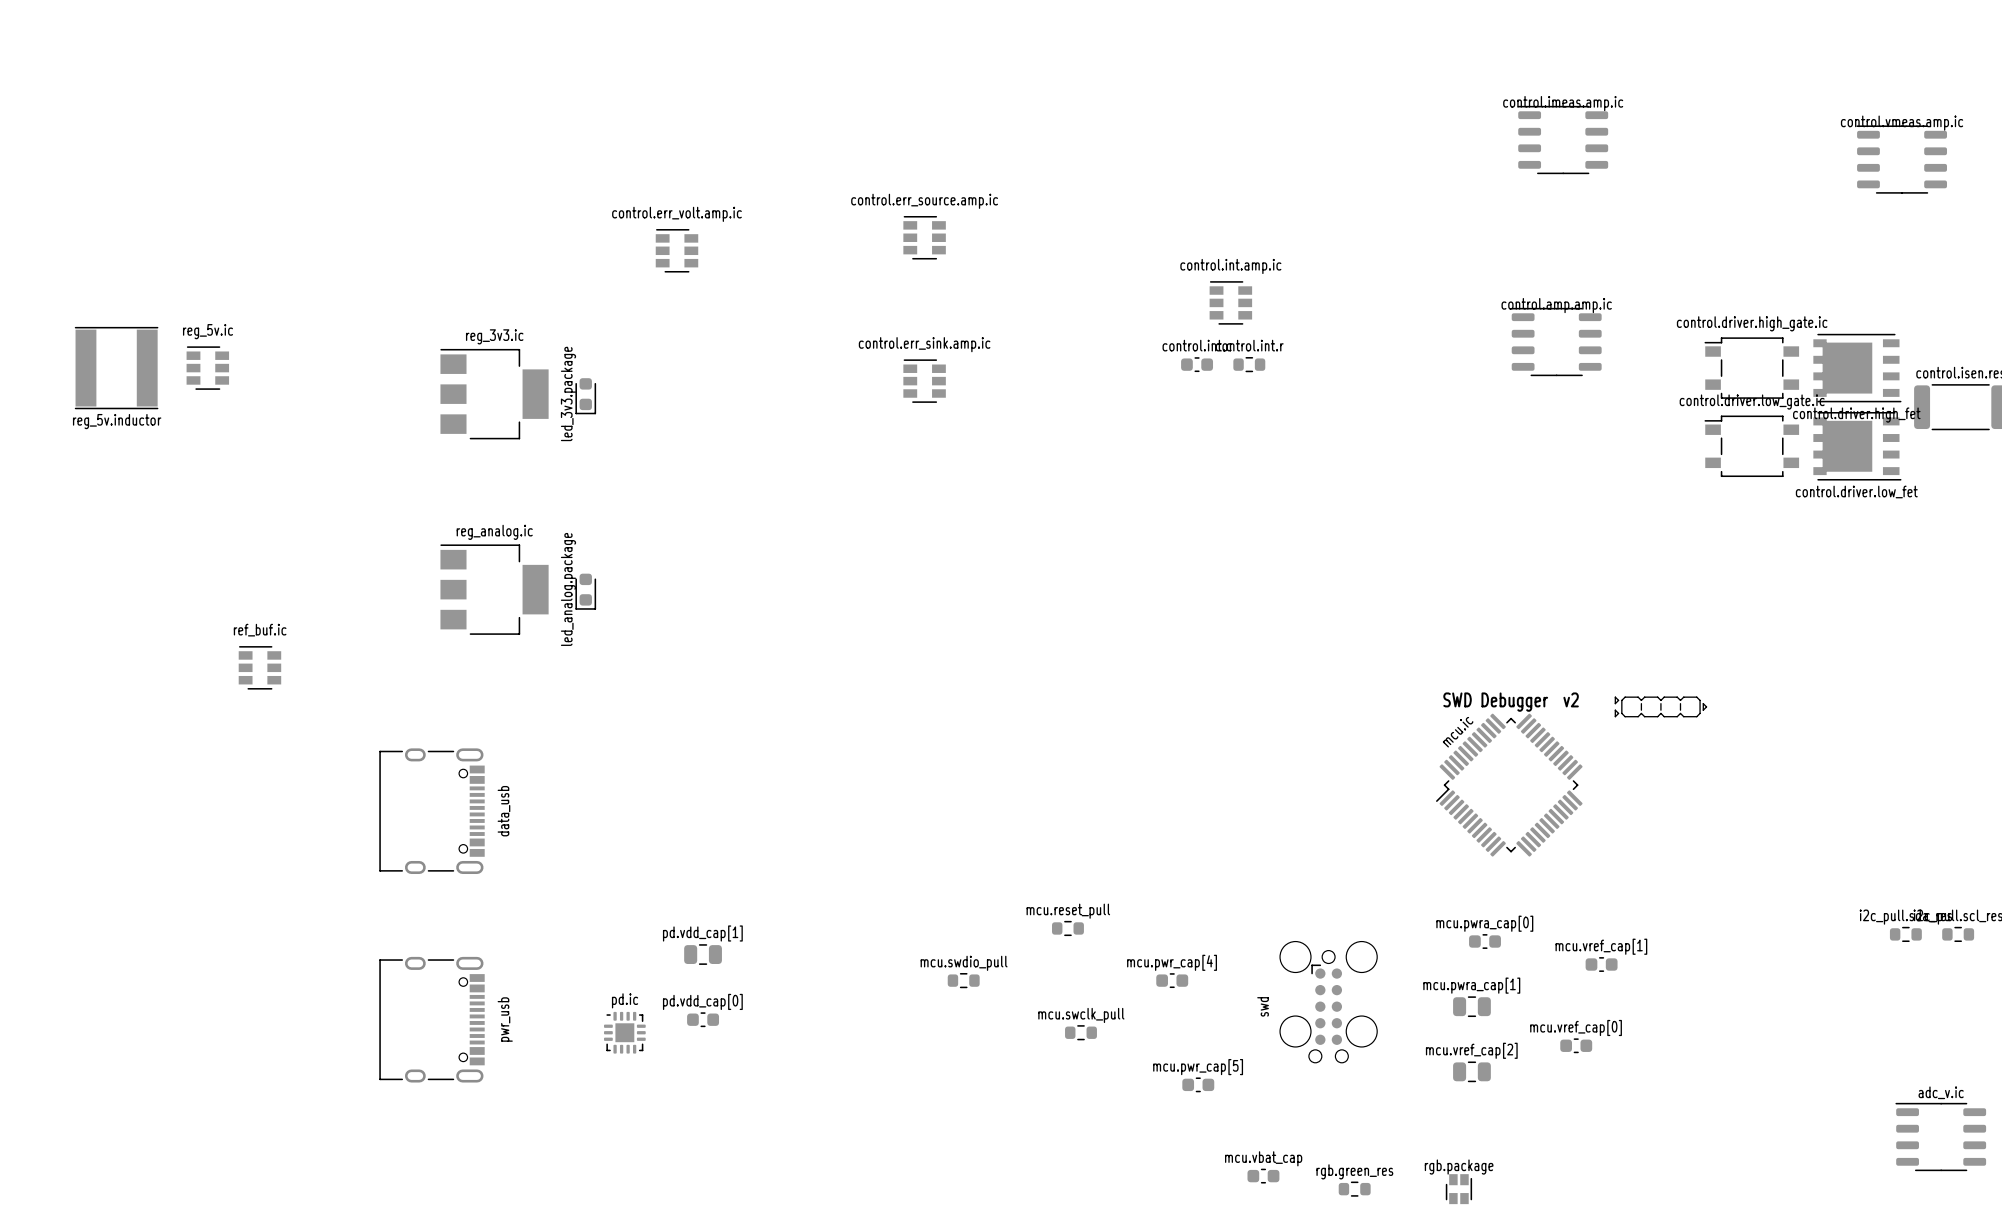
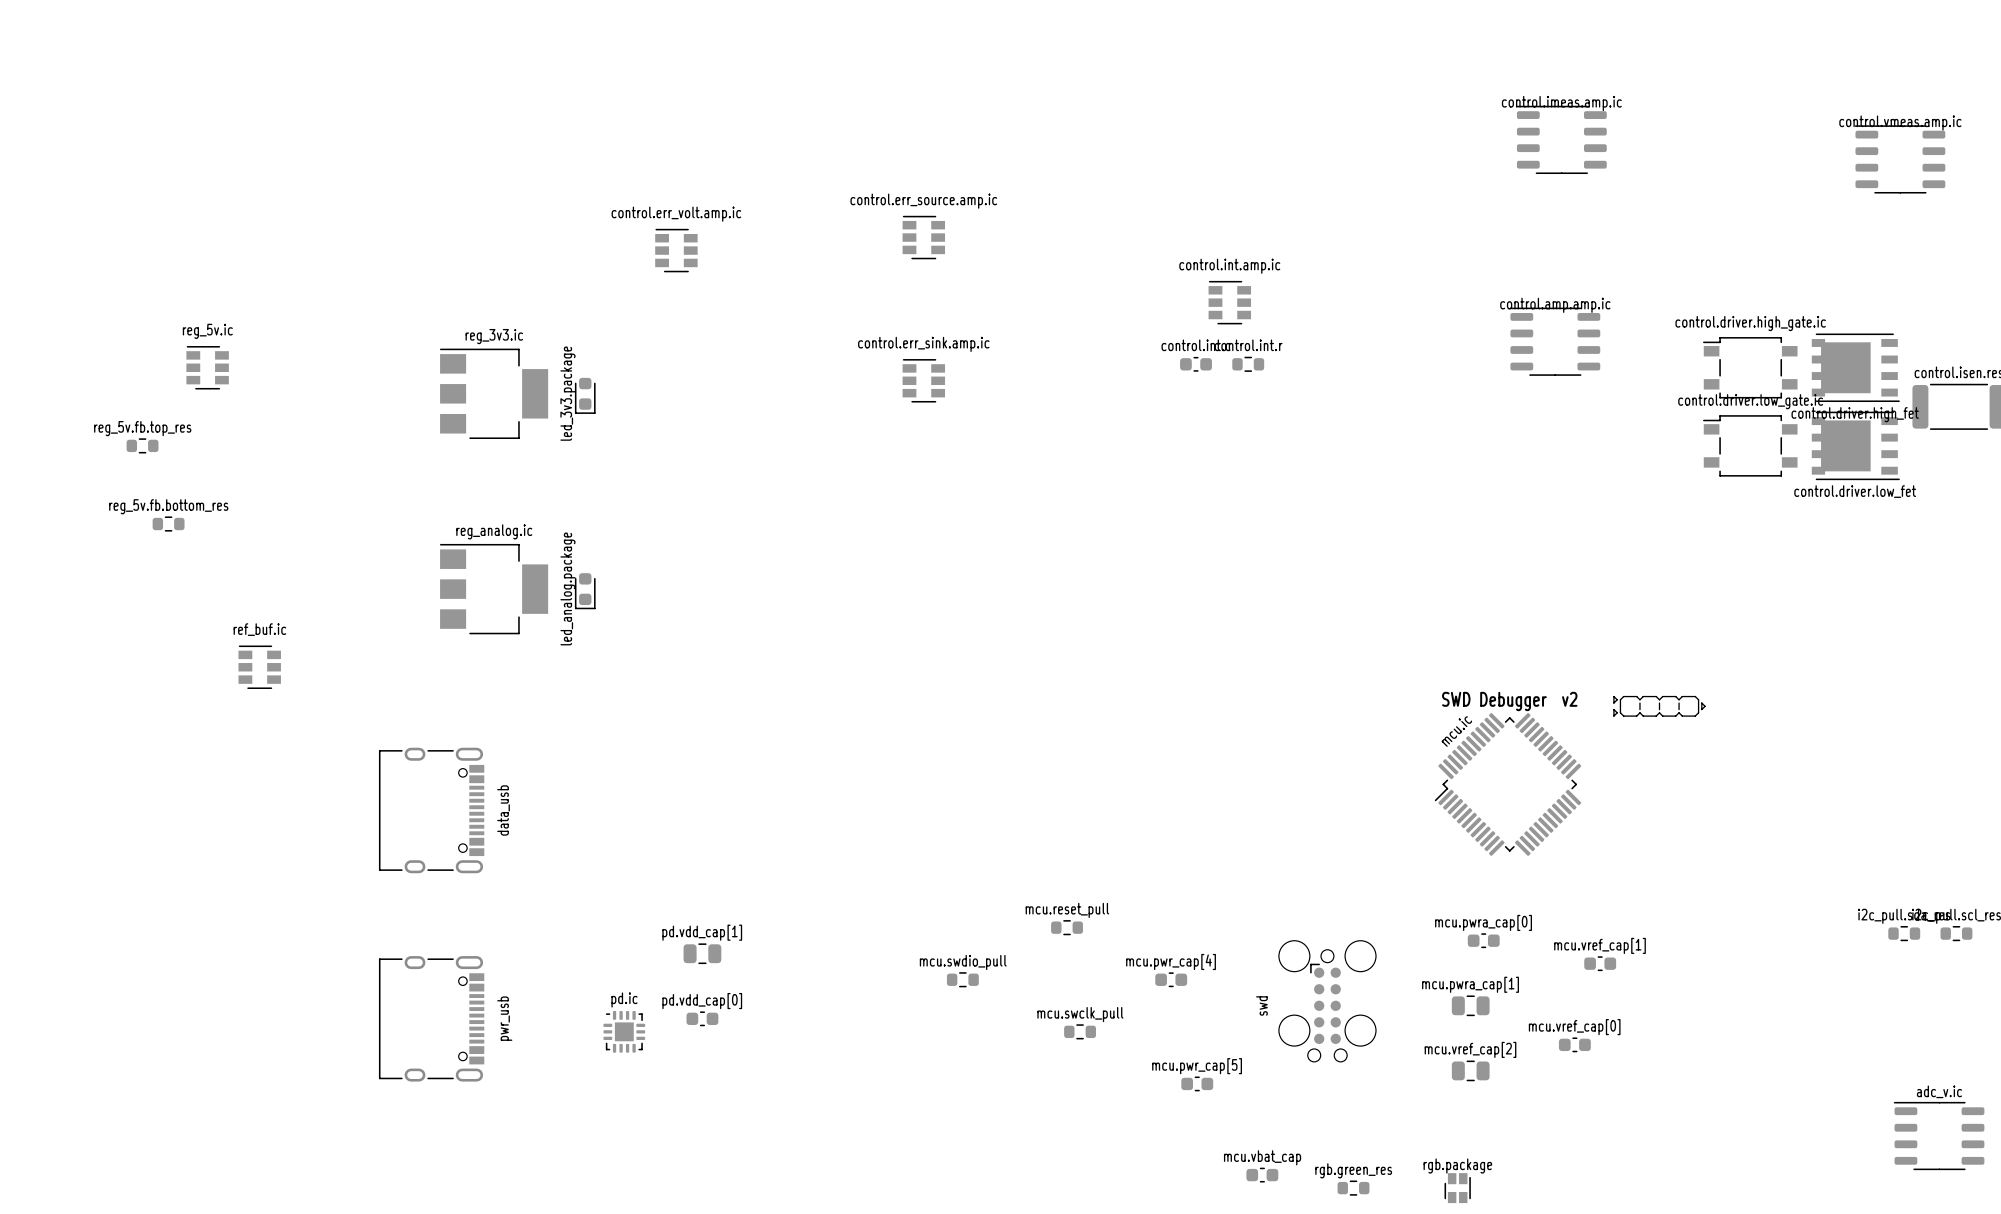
reg_5v.inductor: (116, 368) -> none
reg_5v.fb.top_res: none -> (142, 445)
reg_5v.fb.bottom_res: none -> (168, 524)

